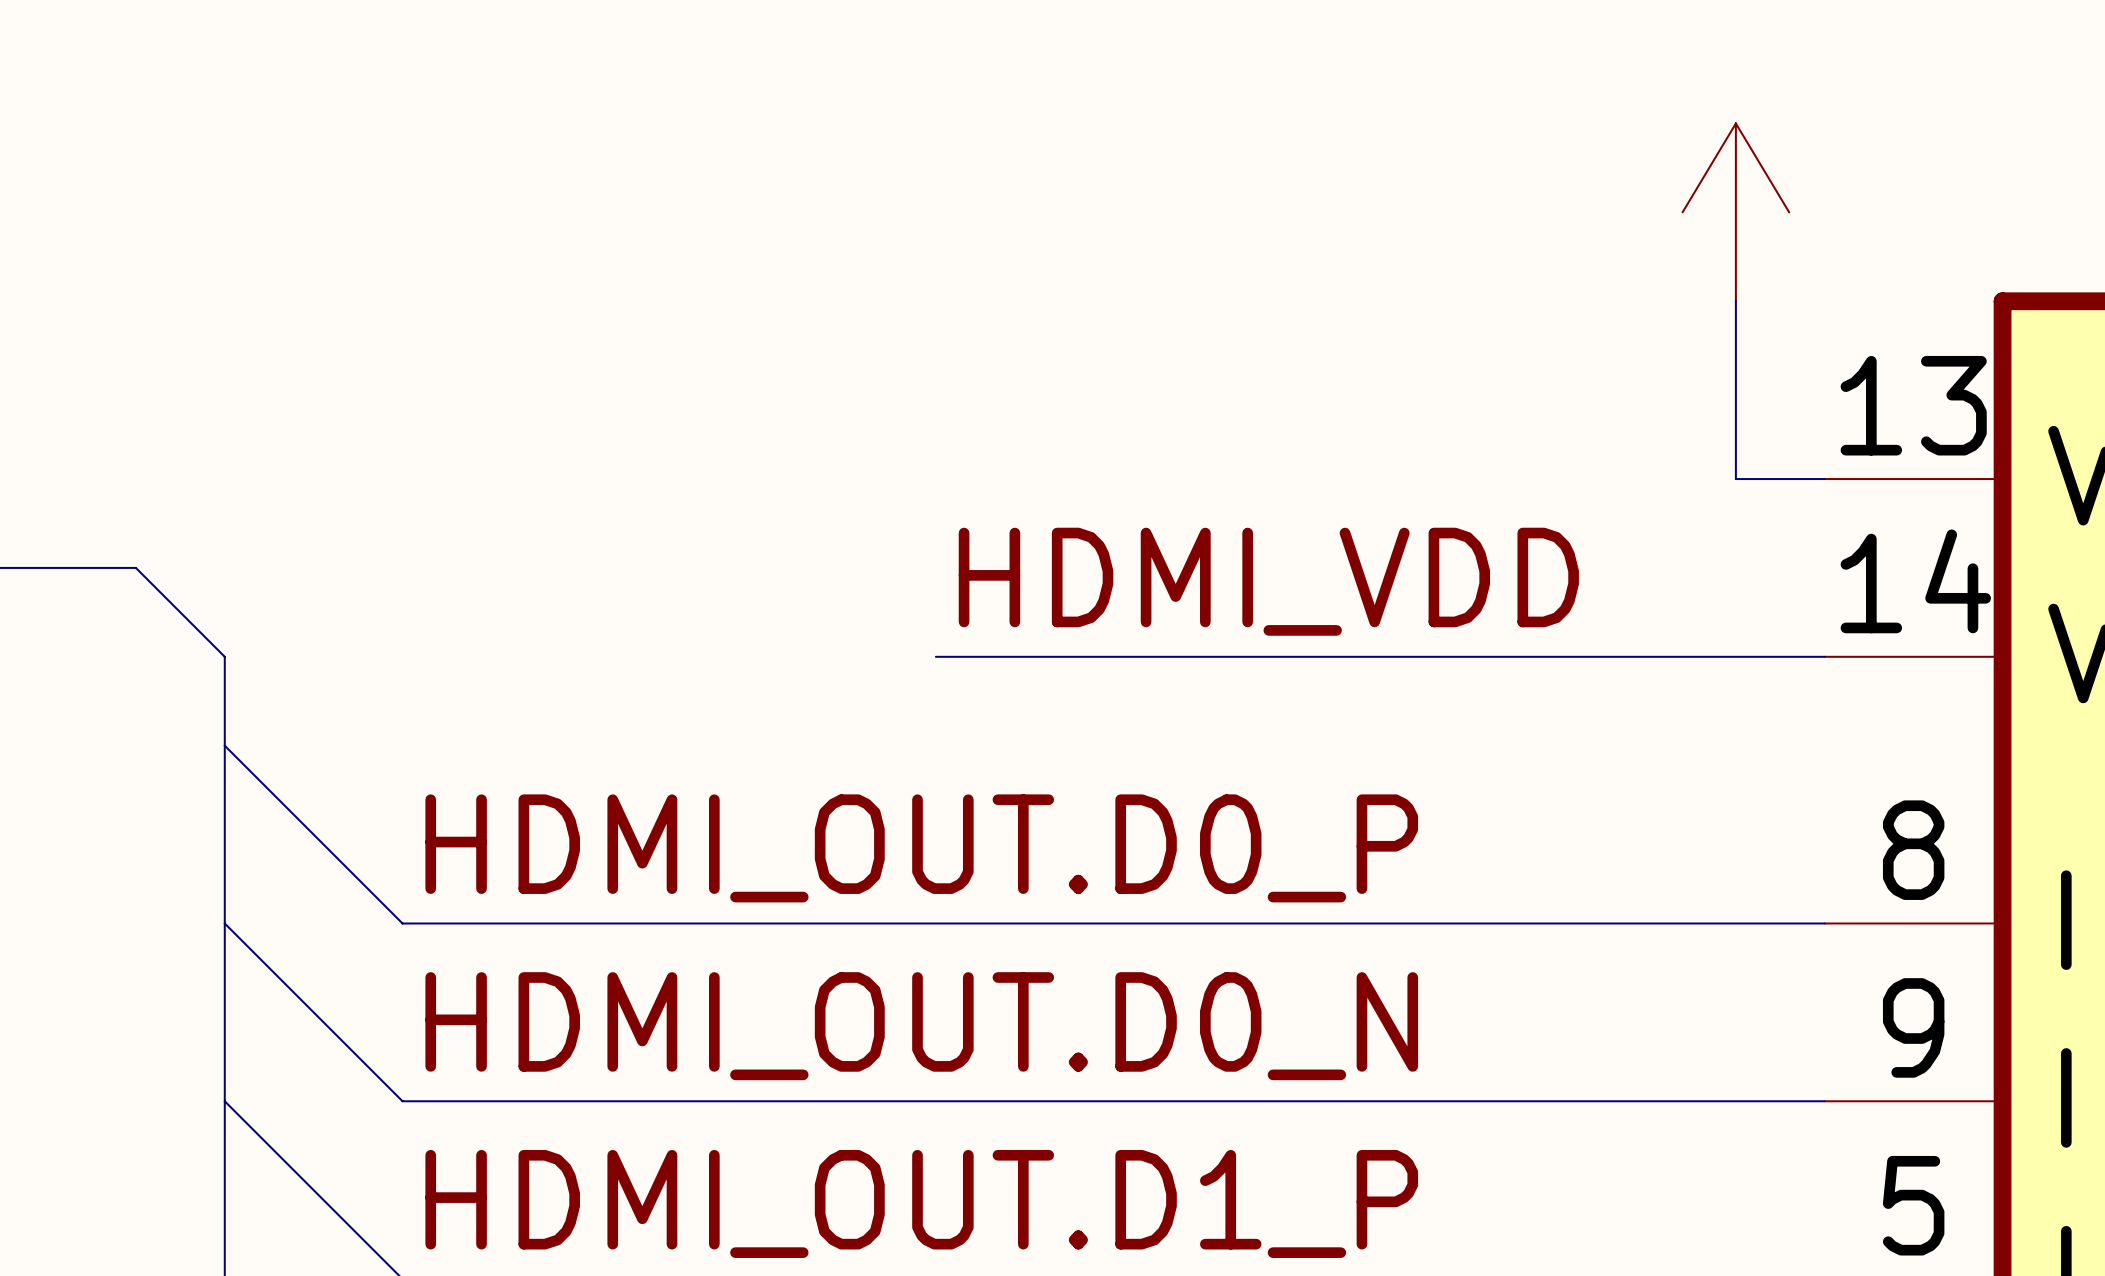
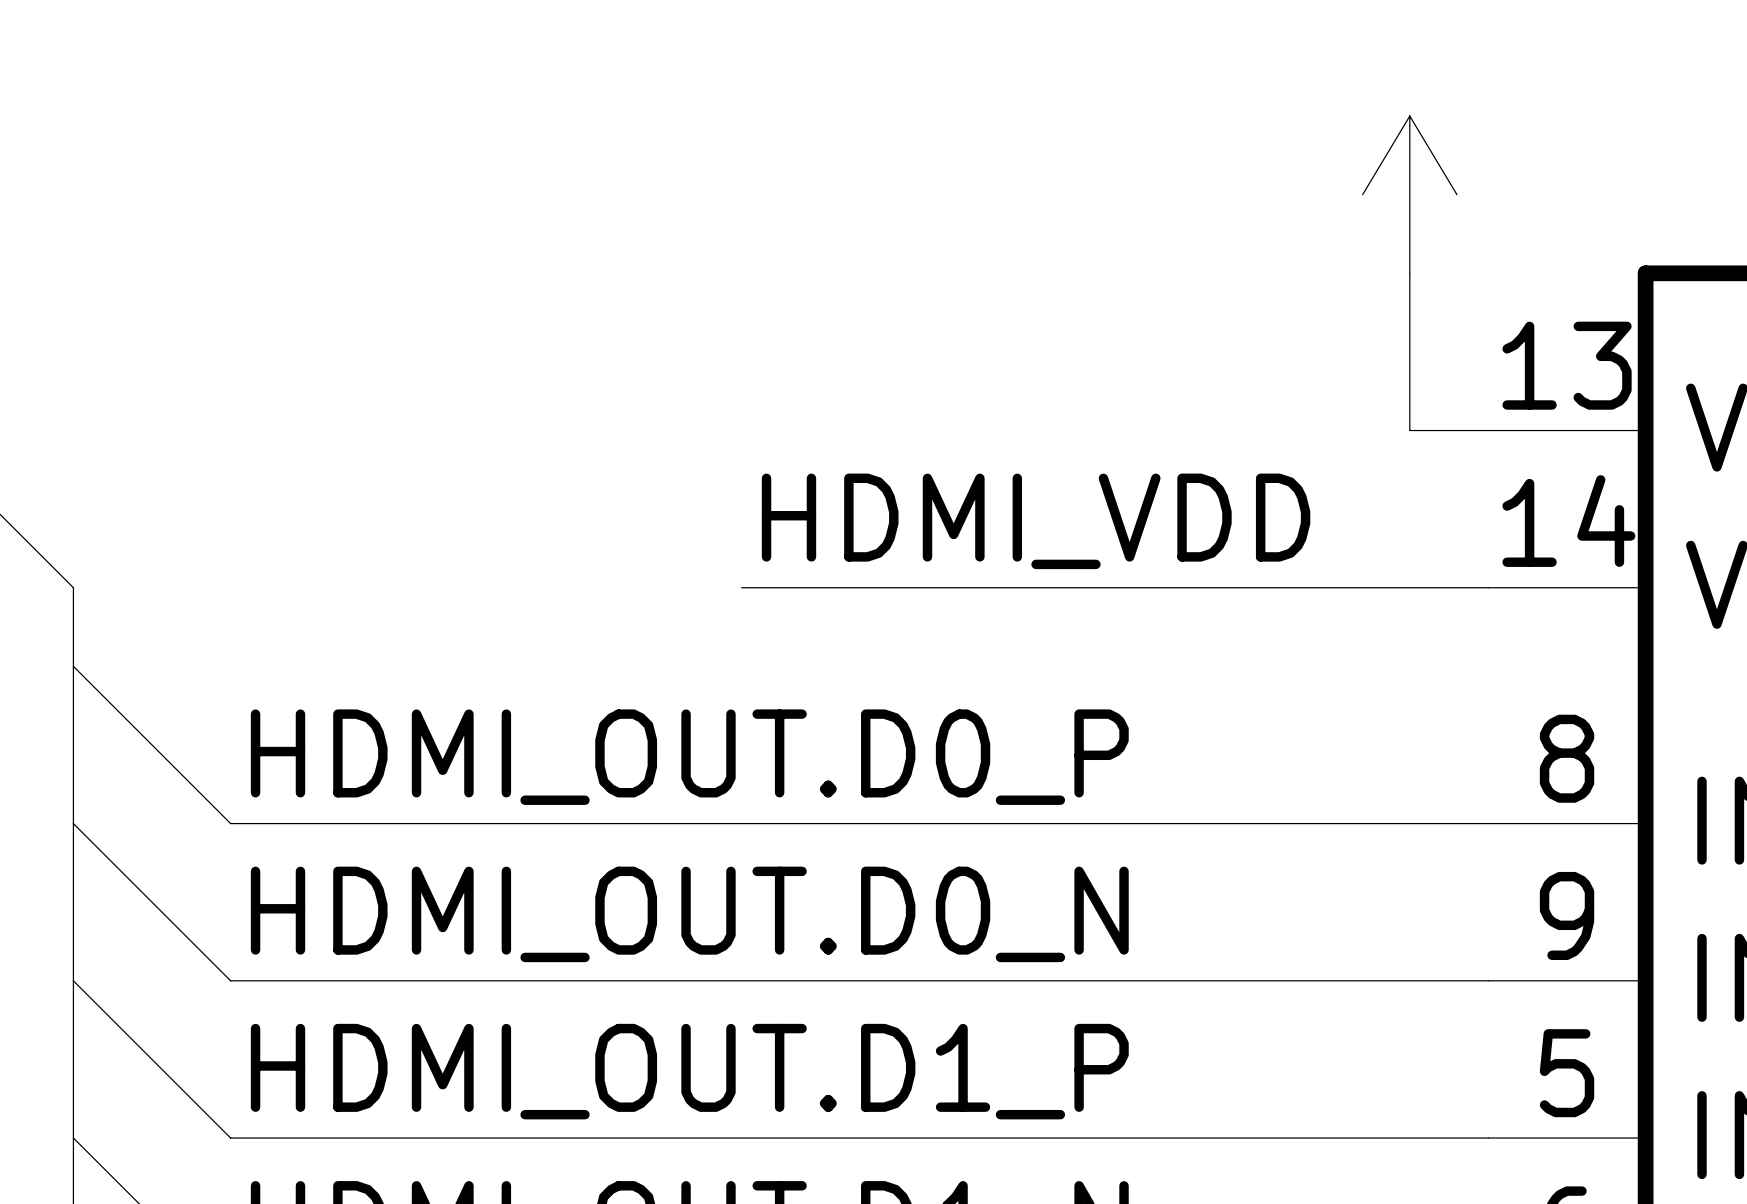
label position: HDMI_VDD (1268, 581) -> HDMI_VDD (1036, 521)
wire: (935, 656) (980, 656) -> none

